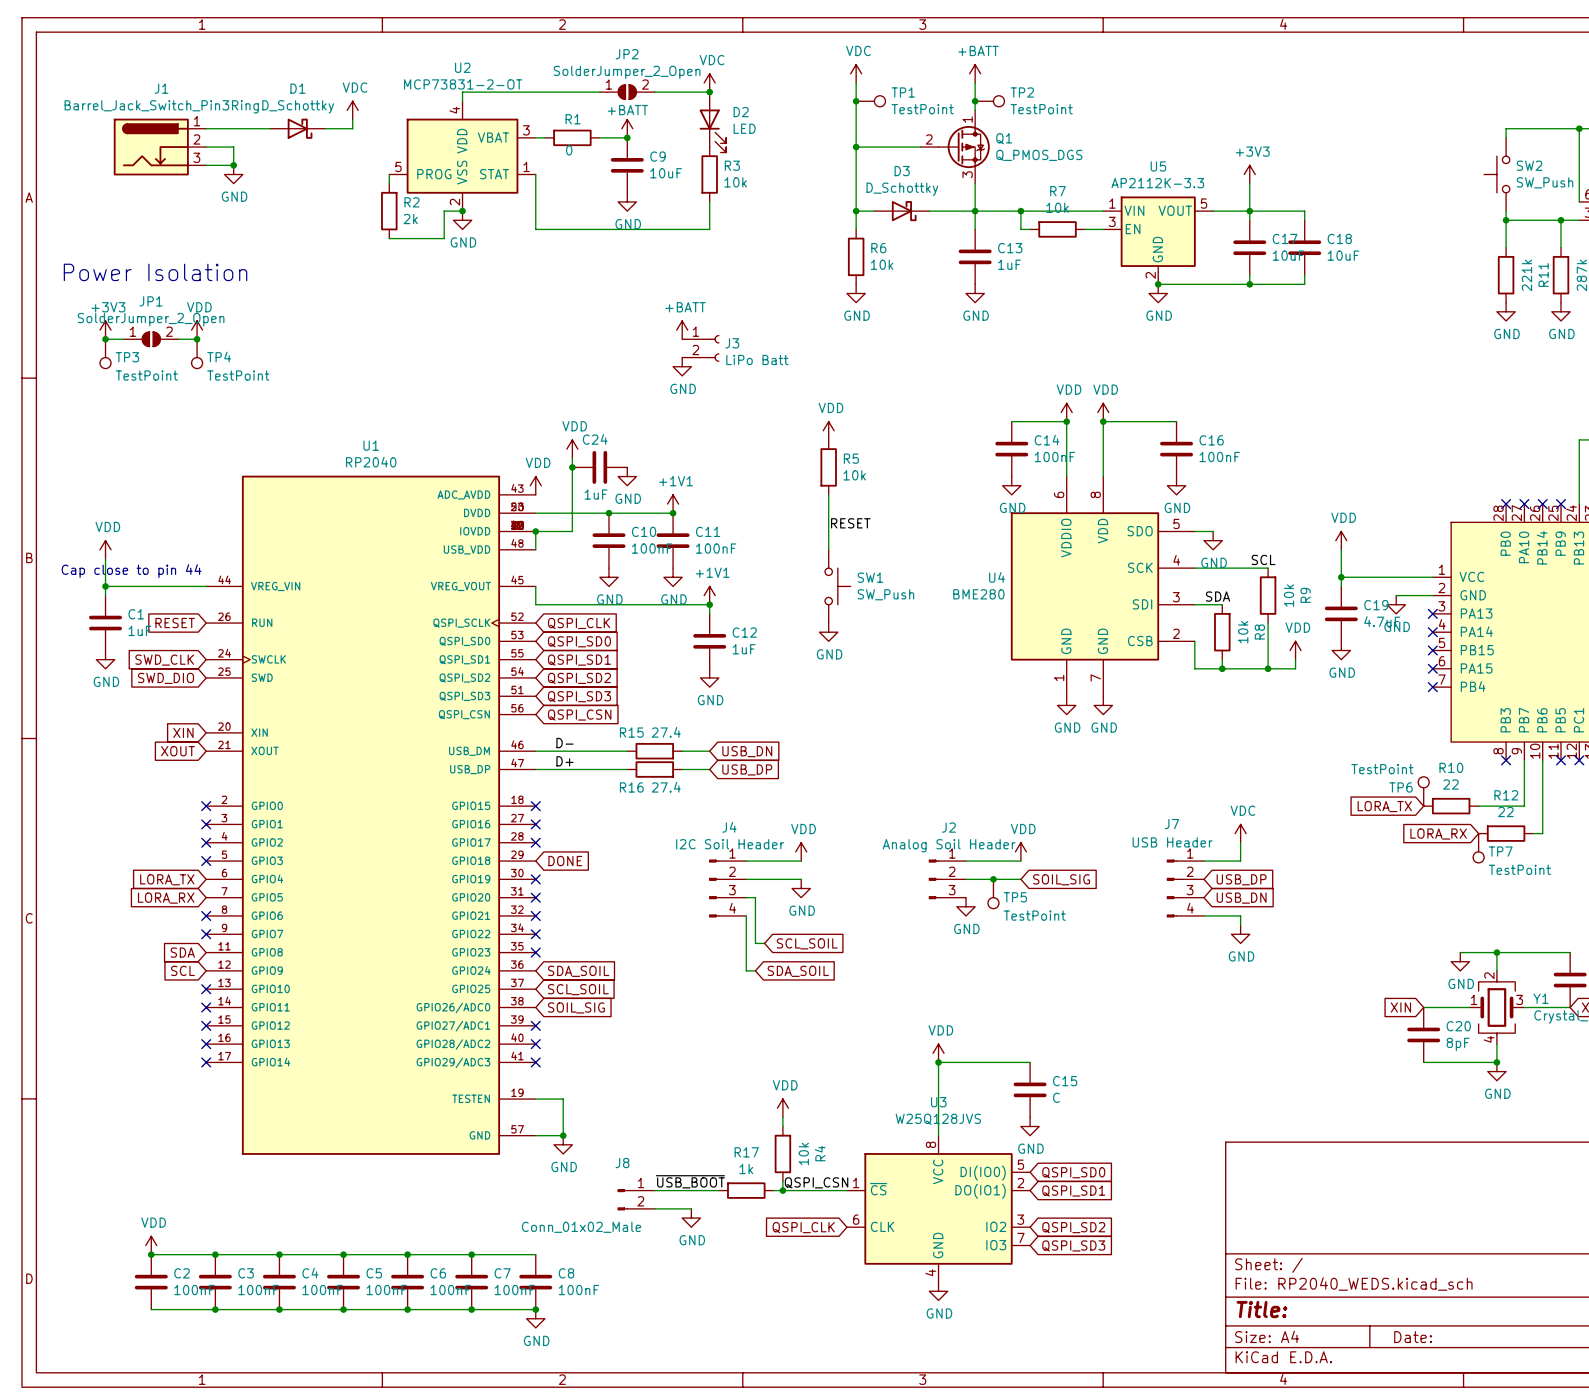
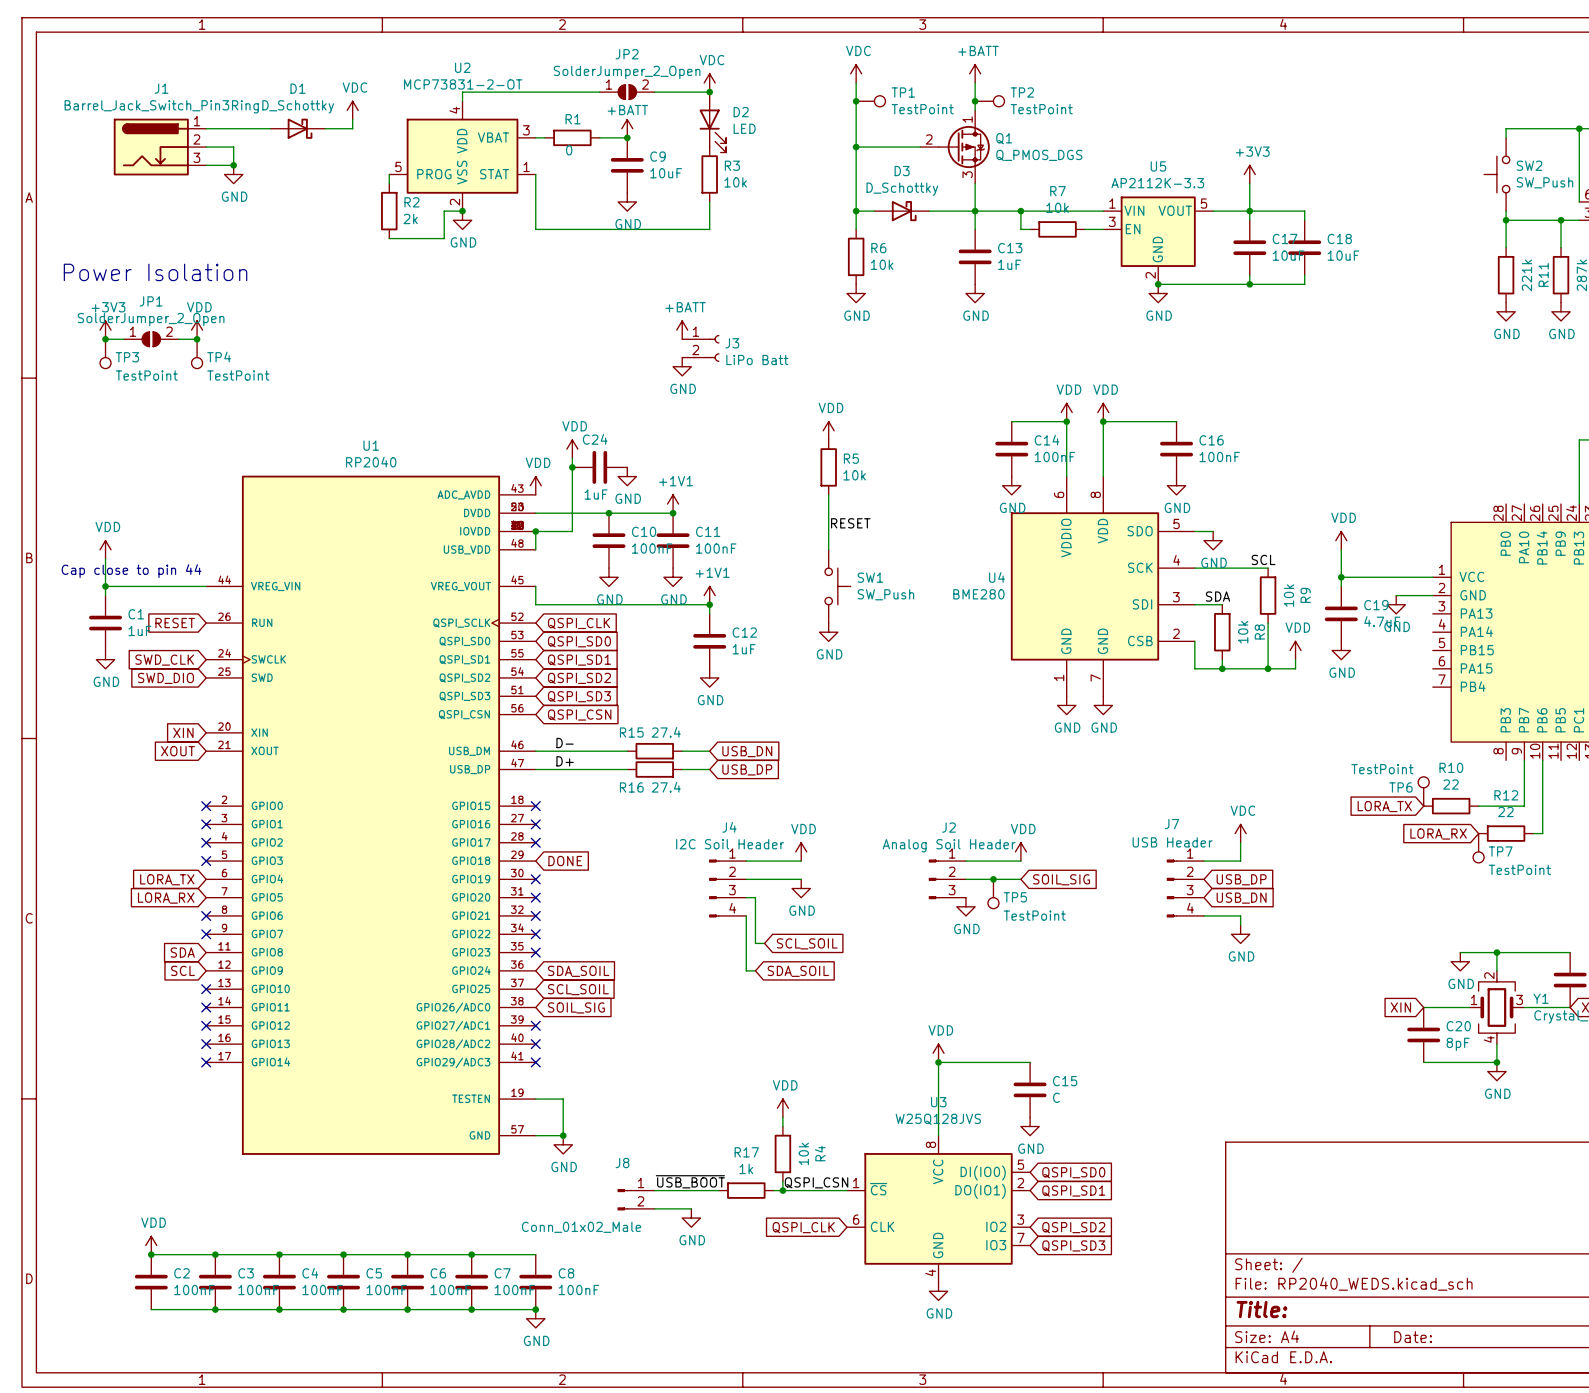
no-connect mark: (1506, 504) -> none
no-connect mark: (1524, 504) -> none
no-connect mark: (1542, 504) -> none
no-connect mark: (1561, 504) -> none
no-connect mark: (1432, 613) -> none
no-connect mark: (1432, 632) -> none
no-connect mark: (1432, 650) -> none
no-connect mark: (1432, 668) -> none
no-connect mark: (1432, 687) -> none
no-connect mark: (1506, 760) -> none
no-connect mark: (1561, 760) -> none
no-connect mark: (1579, 760) -> none

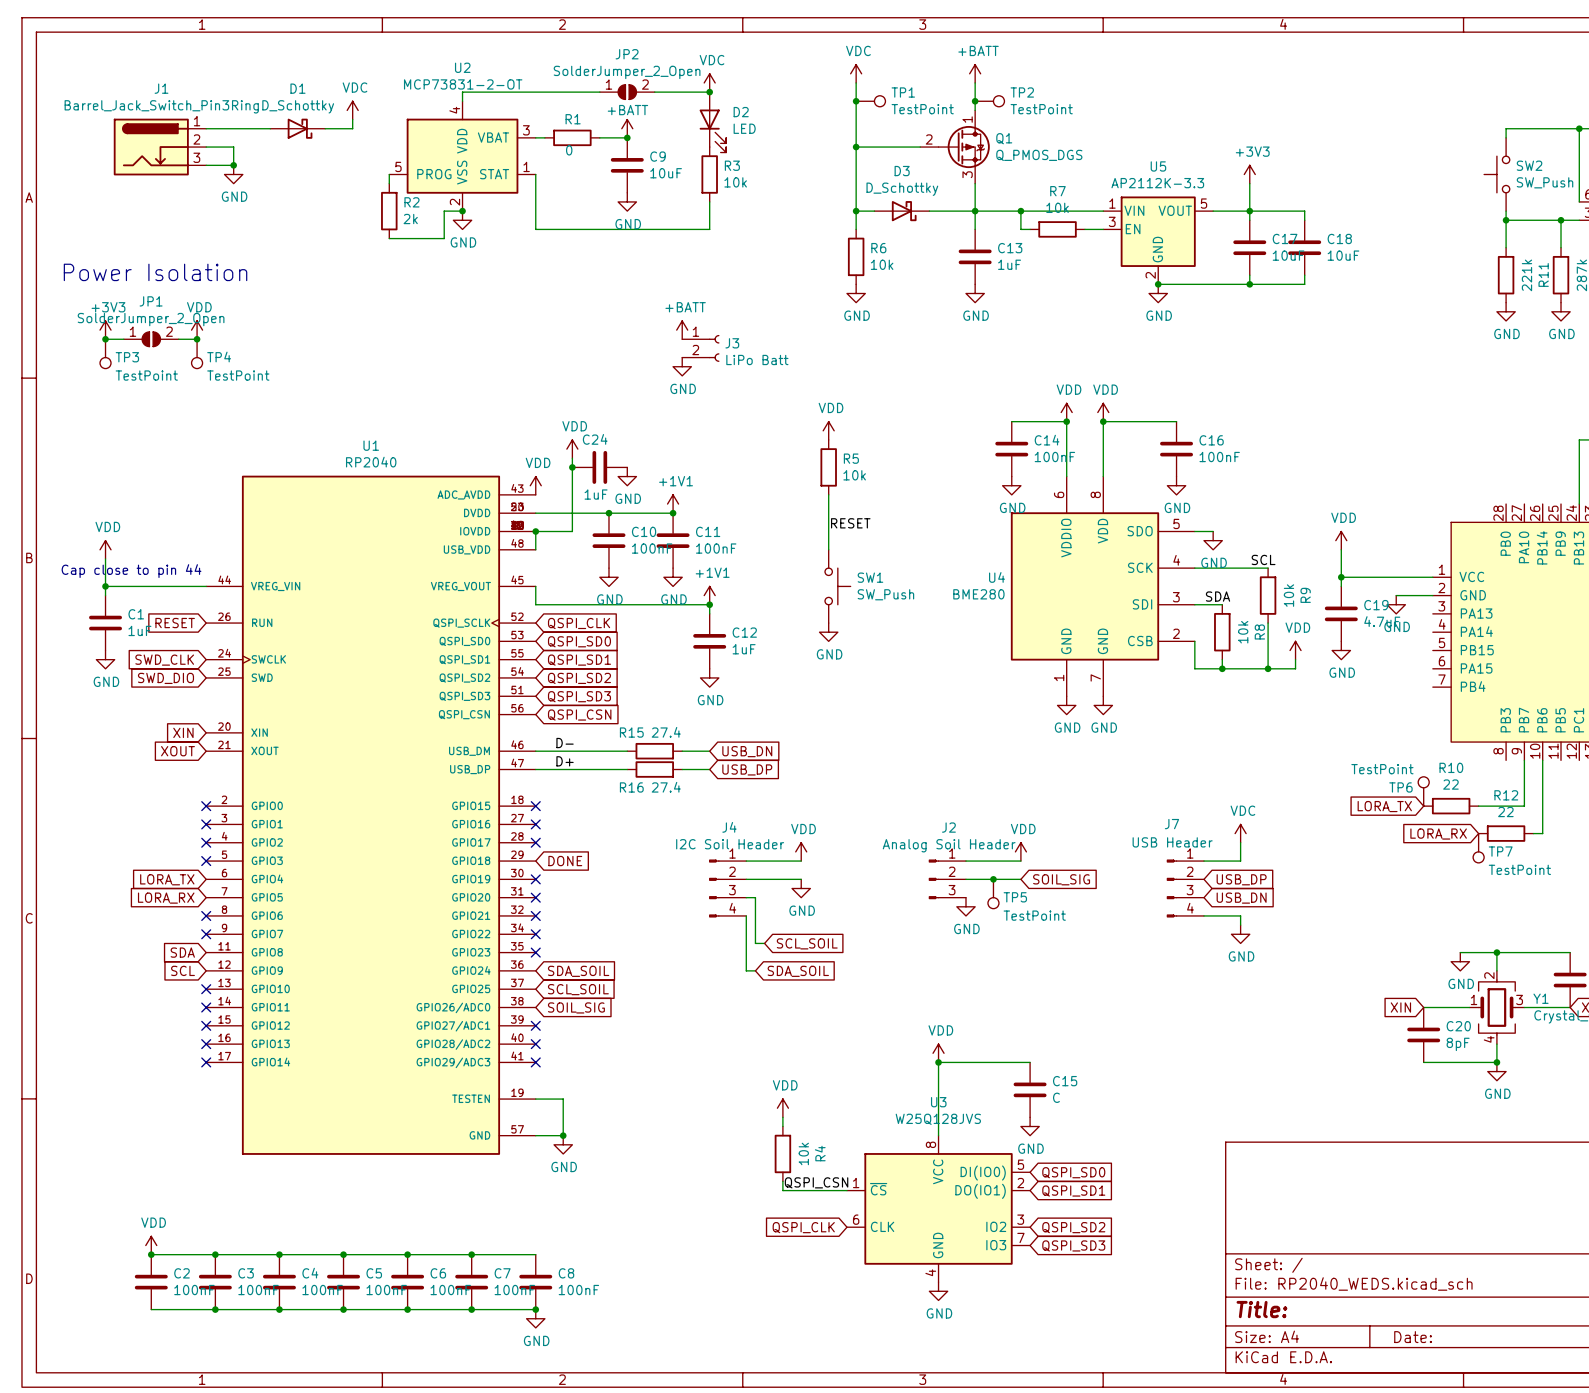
label: ~{USB_BOOT} (690, 1181) -> none
wire: (654, 1190) (718, 1190) -> none
R17: 1k (746, 1190) -> none
wire: (773, 1190) (782, 1190) -> none
junction: (782, 1190) -> none
J8: Conn_01x02_Male (636, 1199) -> none
wire: (654, 1208) (691, 1208) -> none
power symbol: GND (691, 1218) -> none

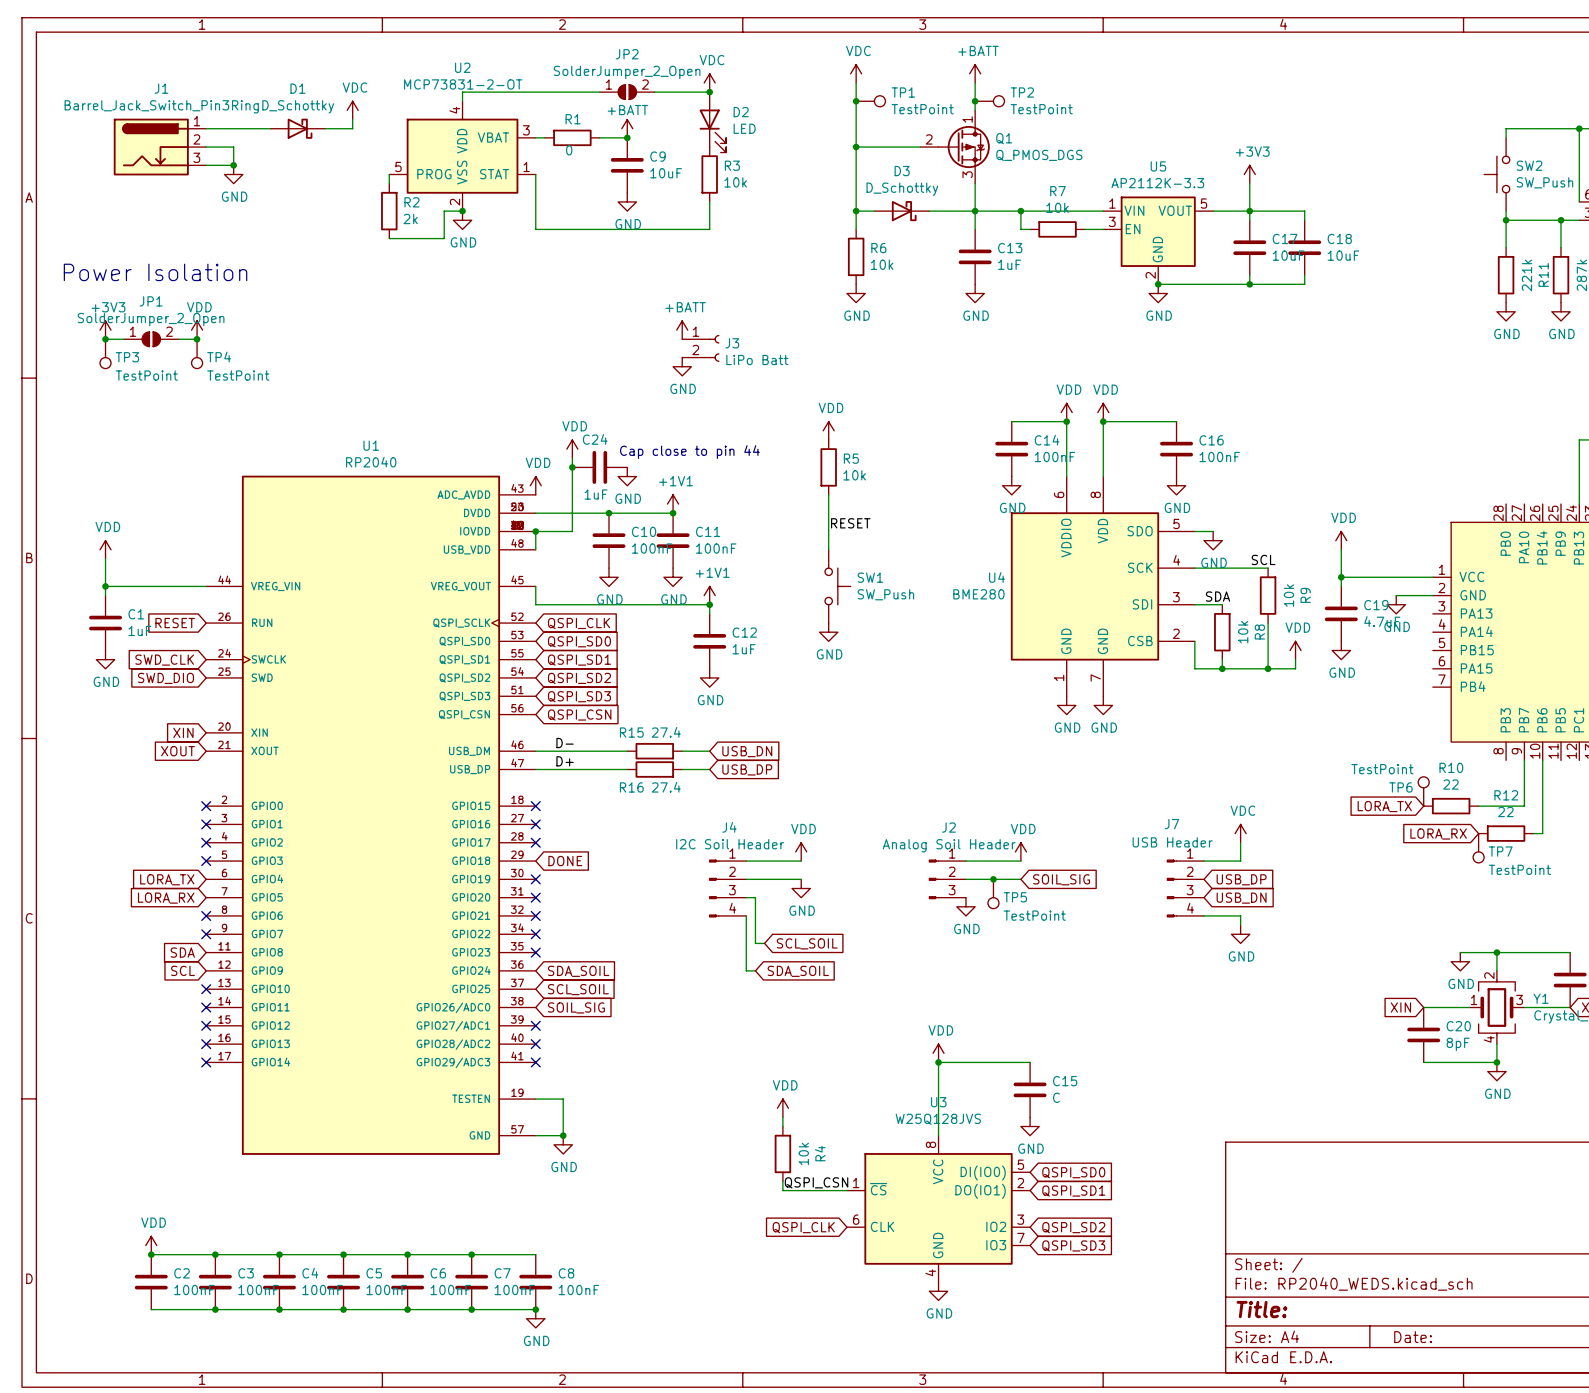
text: none -> Cap close to pin 44 (689, 452)
text: Cap close to pin 44 (131, 571) -> none

